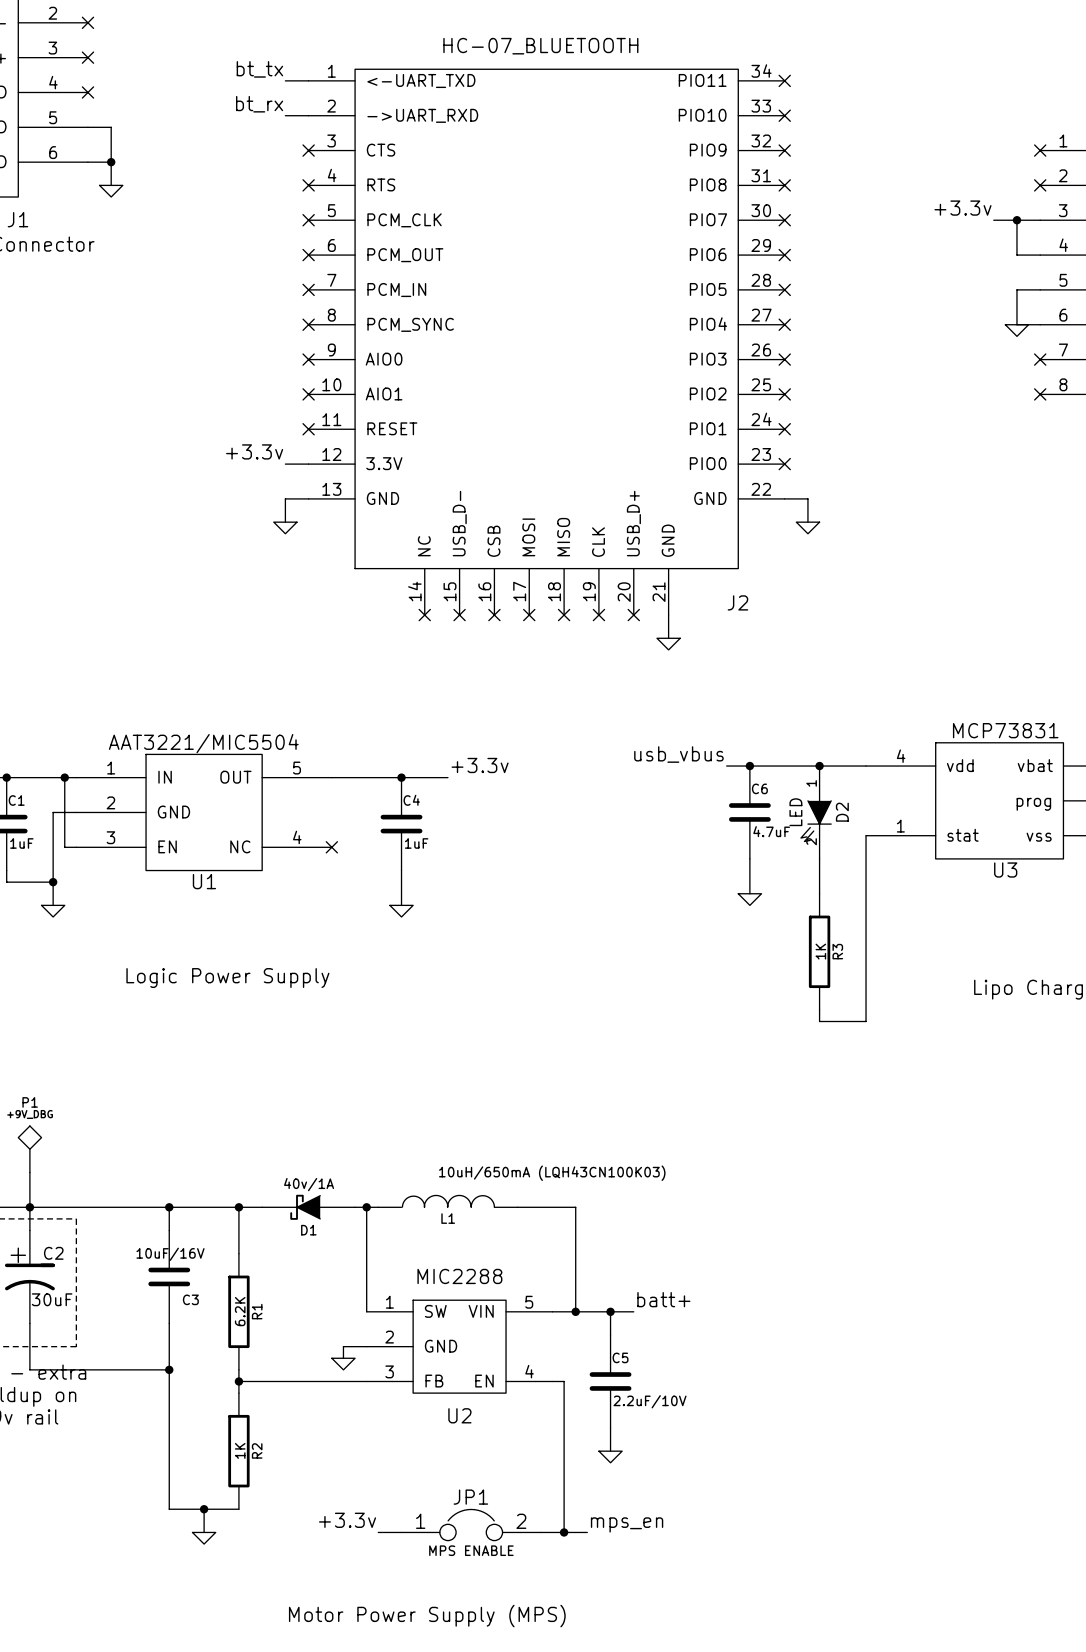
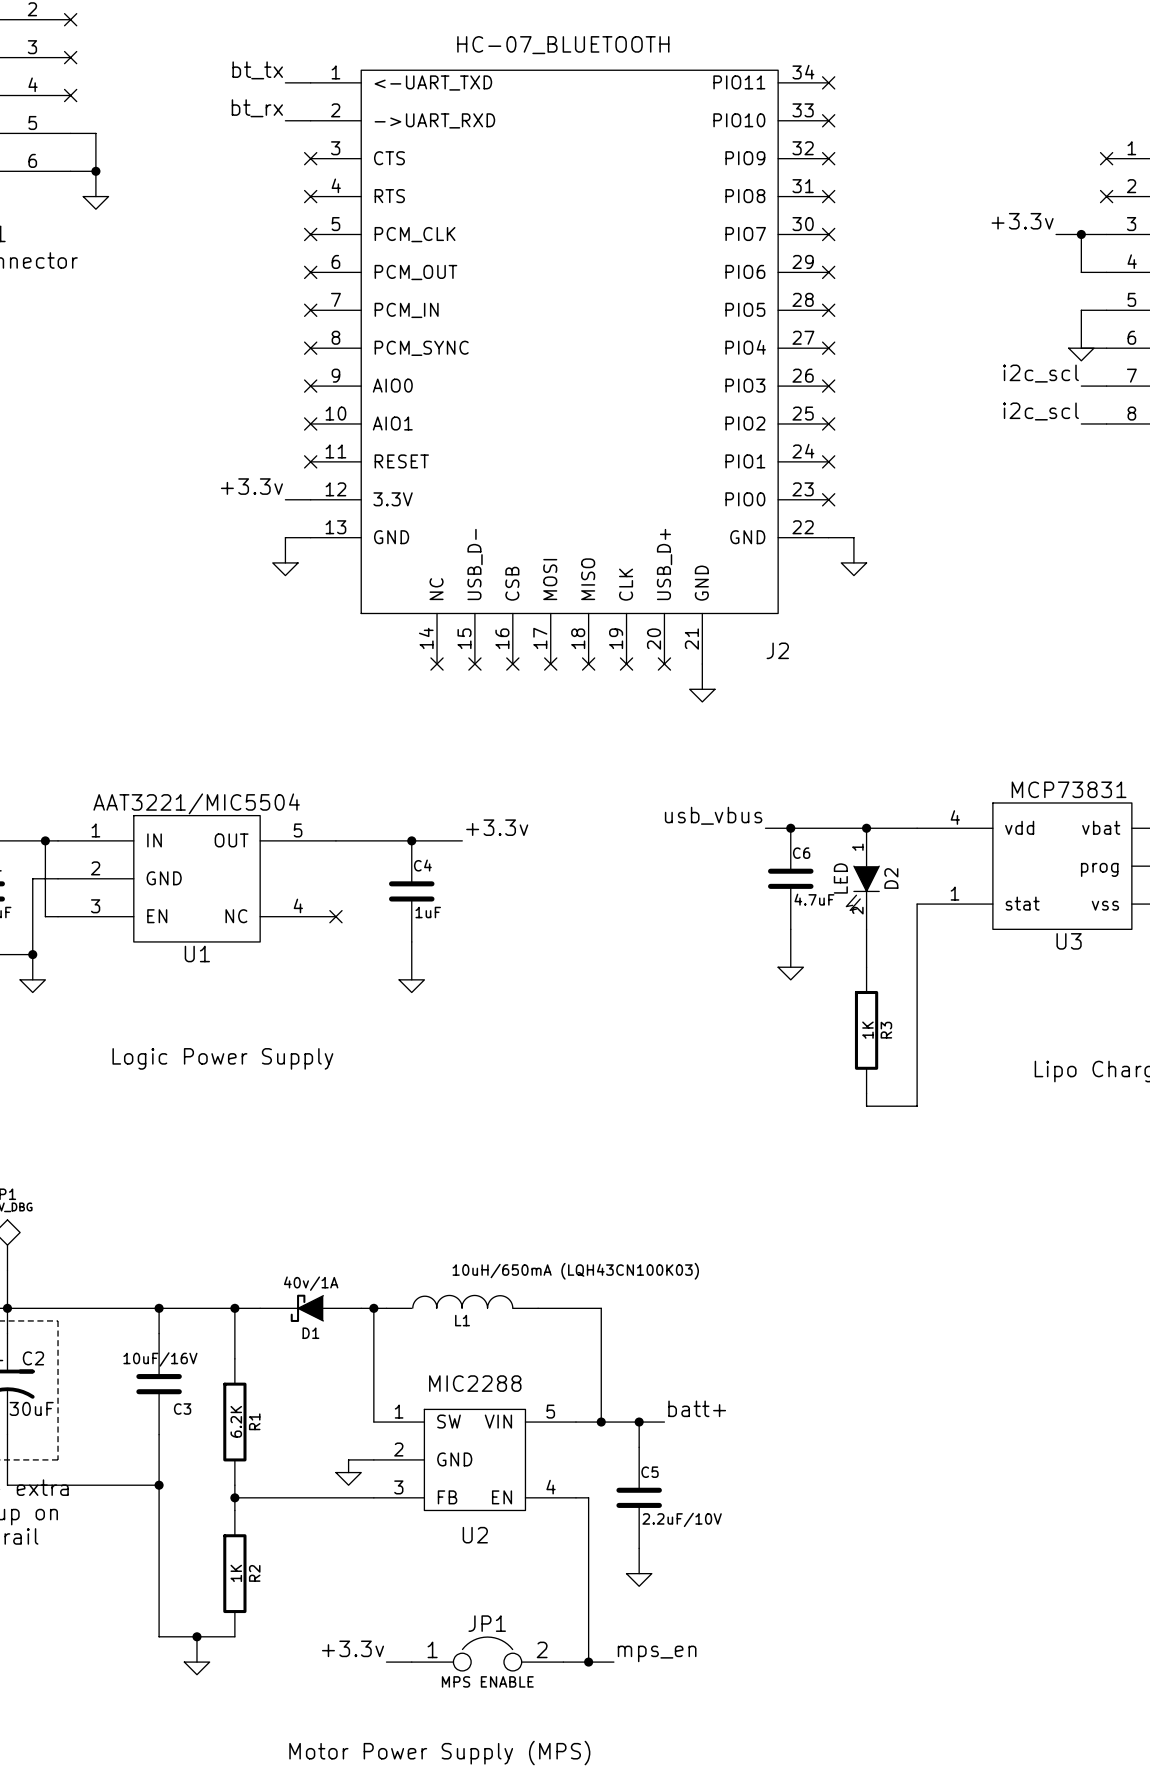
label: none -> i2c_scl (1040, 373)
wire: none -> (1081, 386) (1106, 386)
no-connect mark: (1040, 359) -> none
label: none -> i2c_scl (1040, 411)
wire: none -> (1081, 423) (1106, 423)
no-connect mark: (1040, 394) -> none

